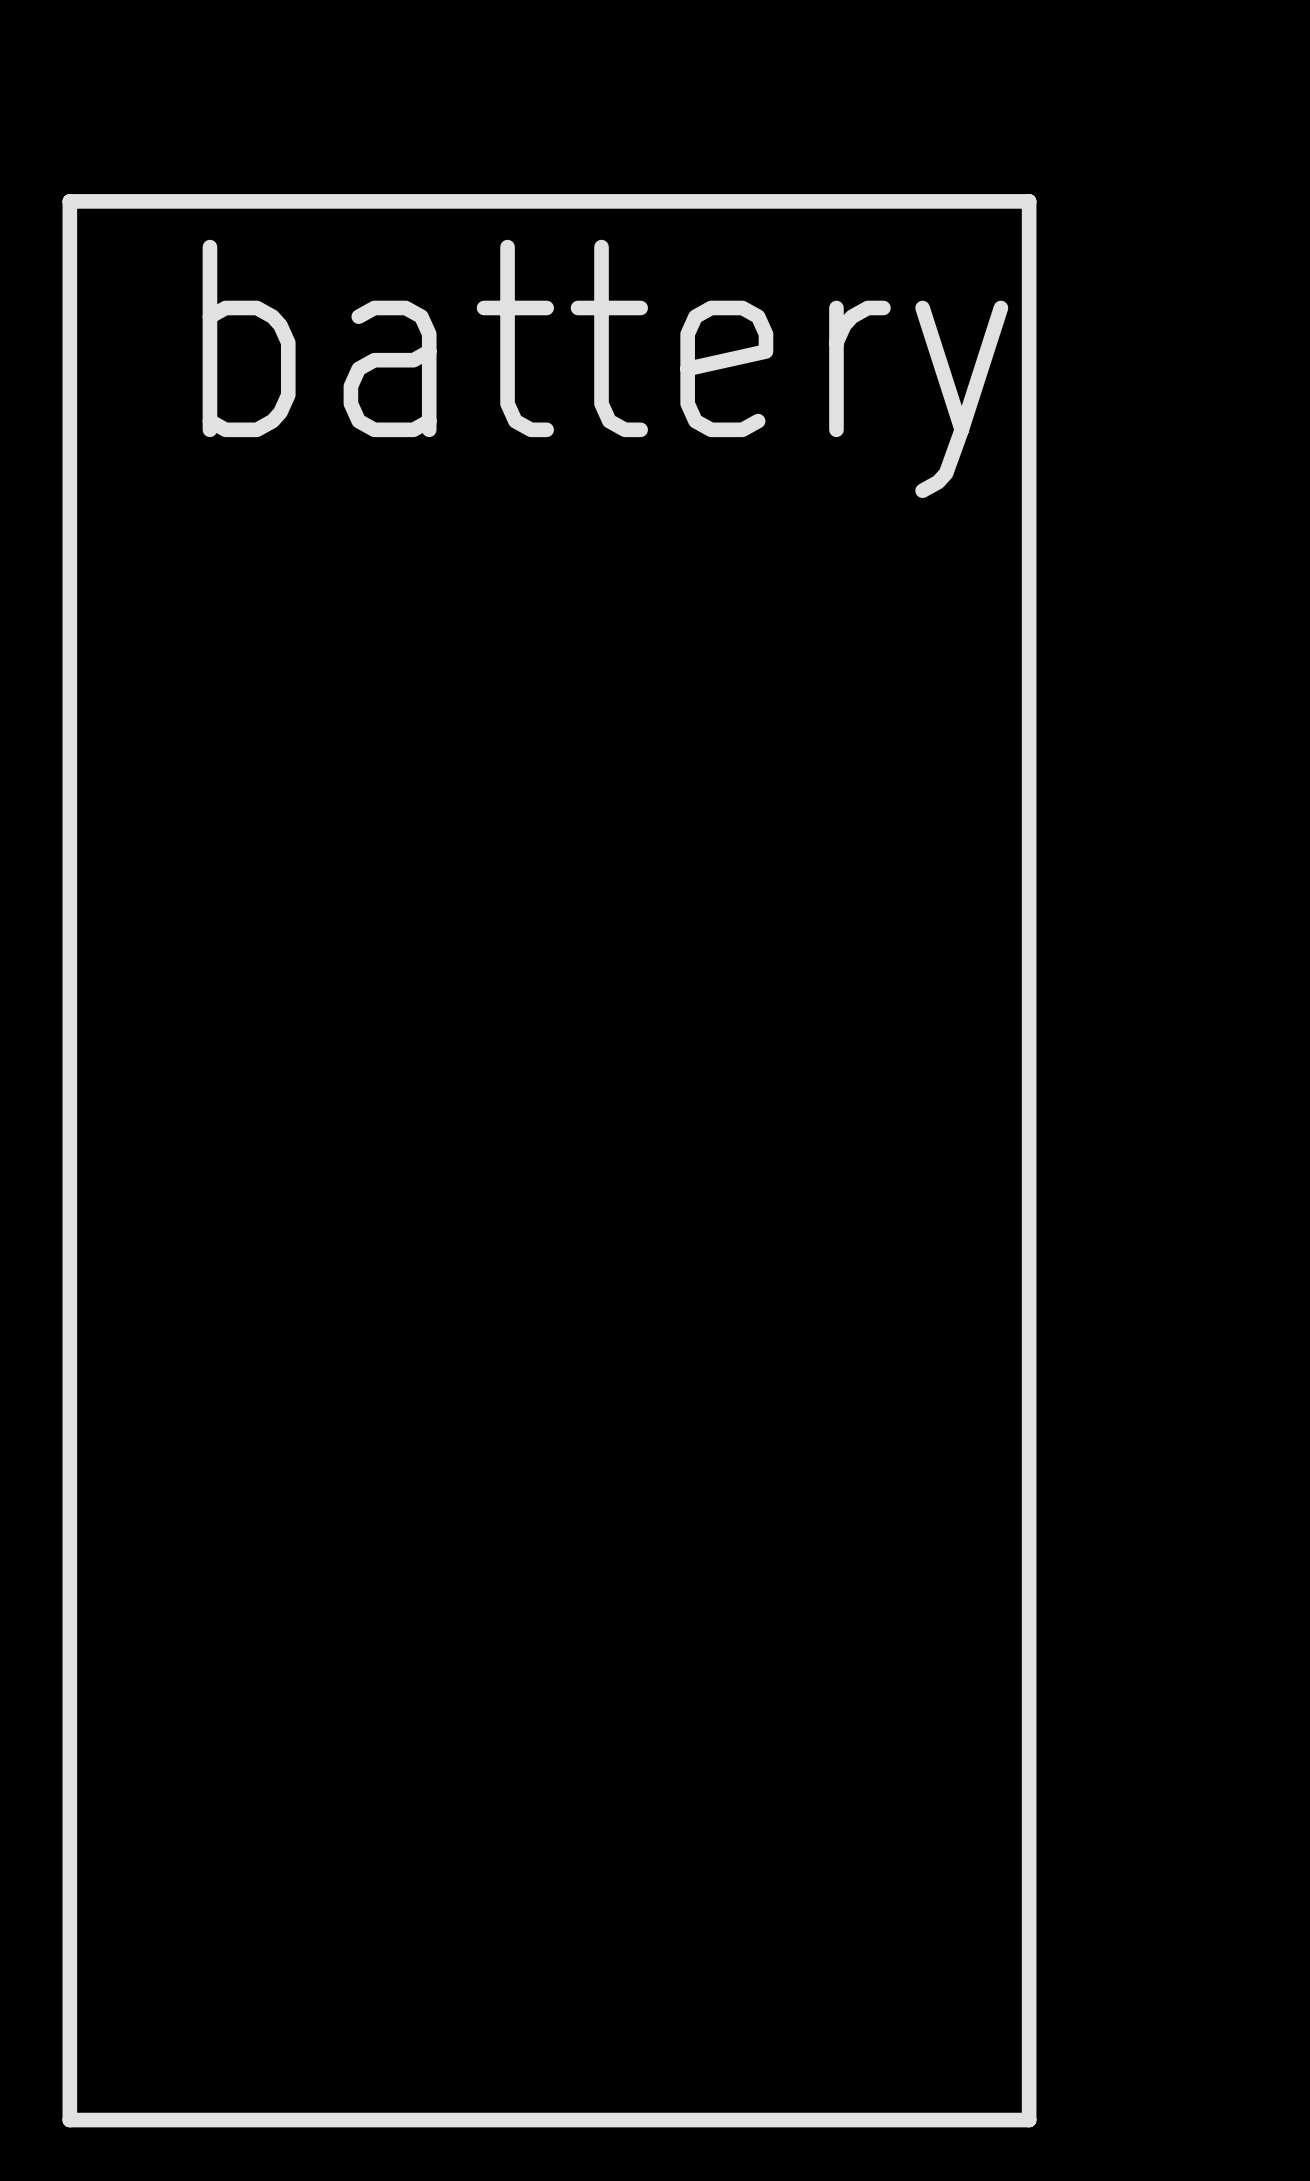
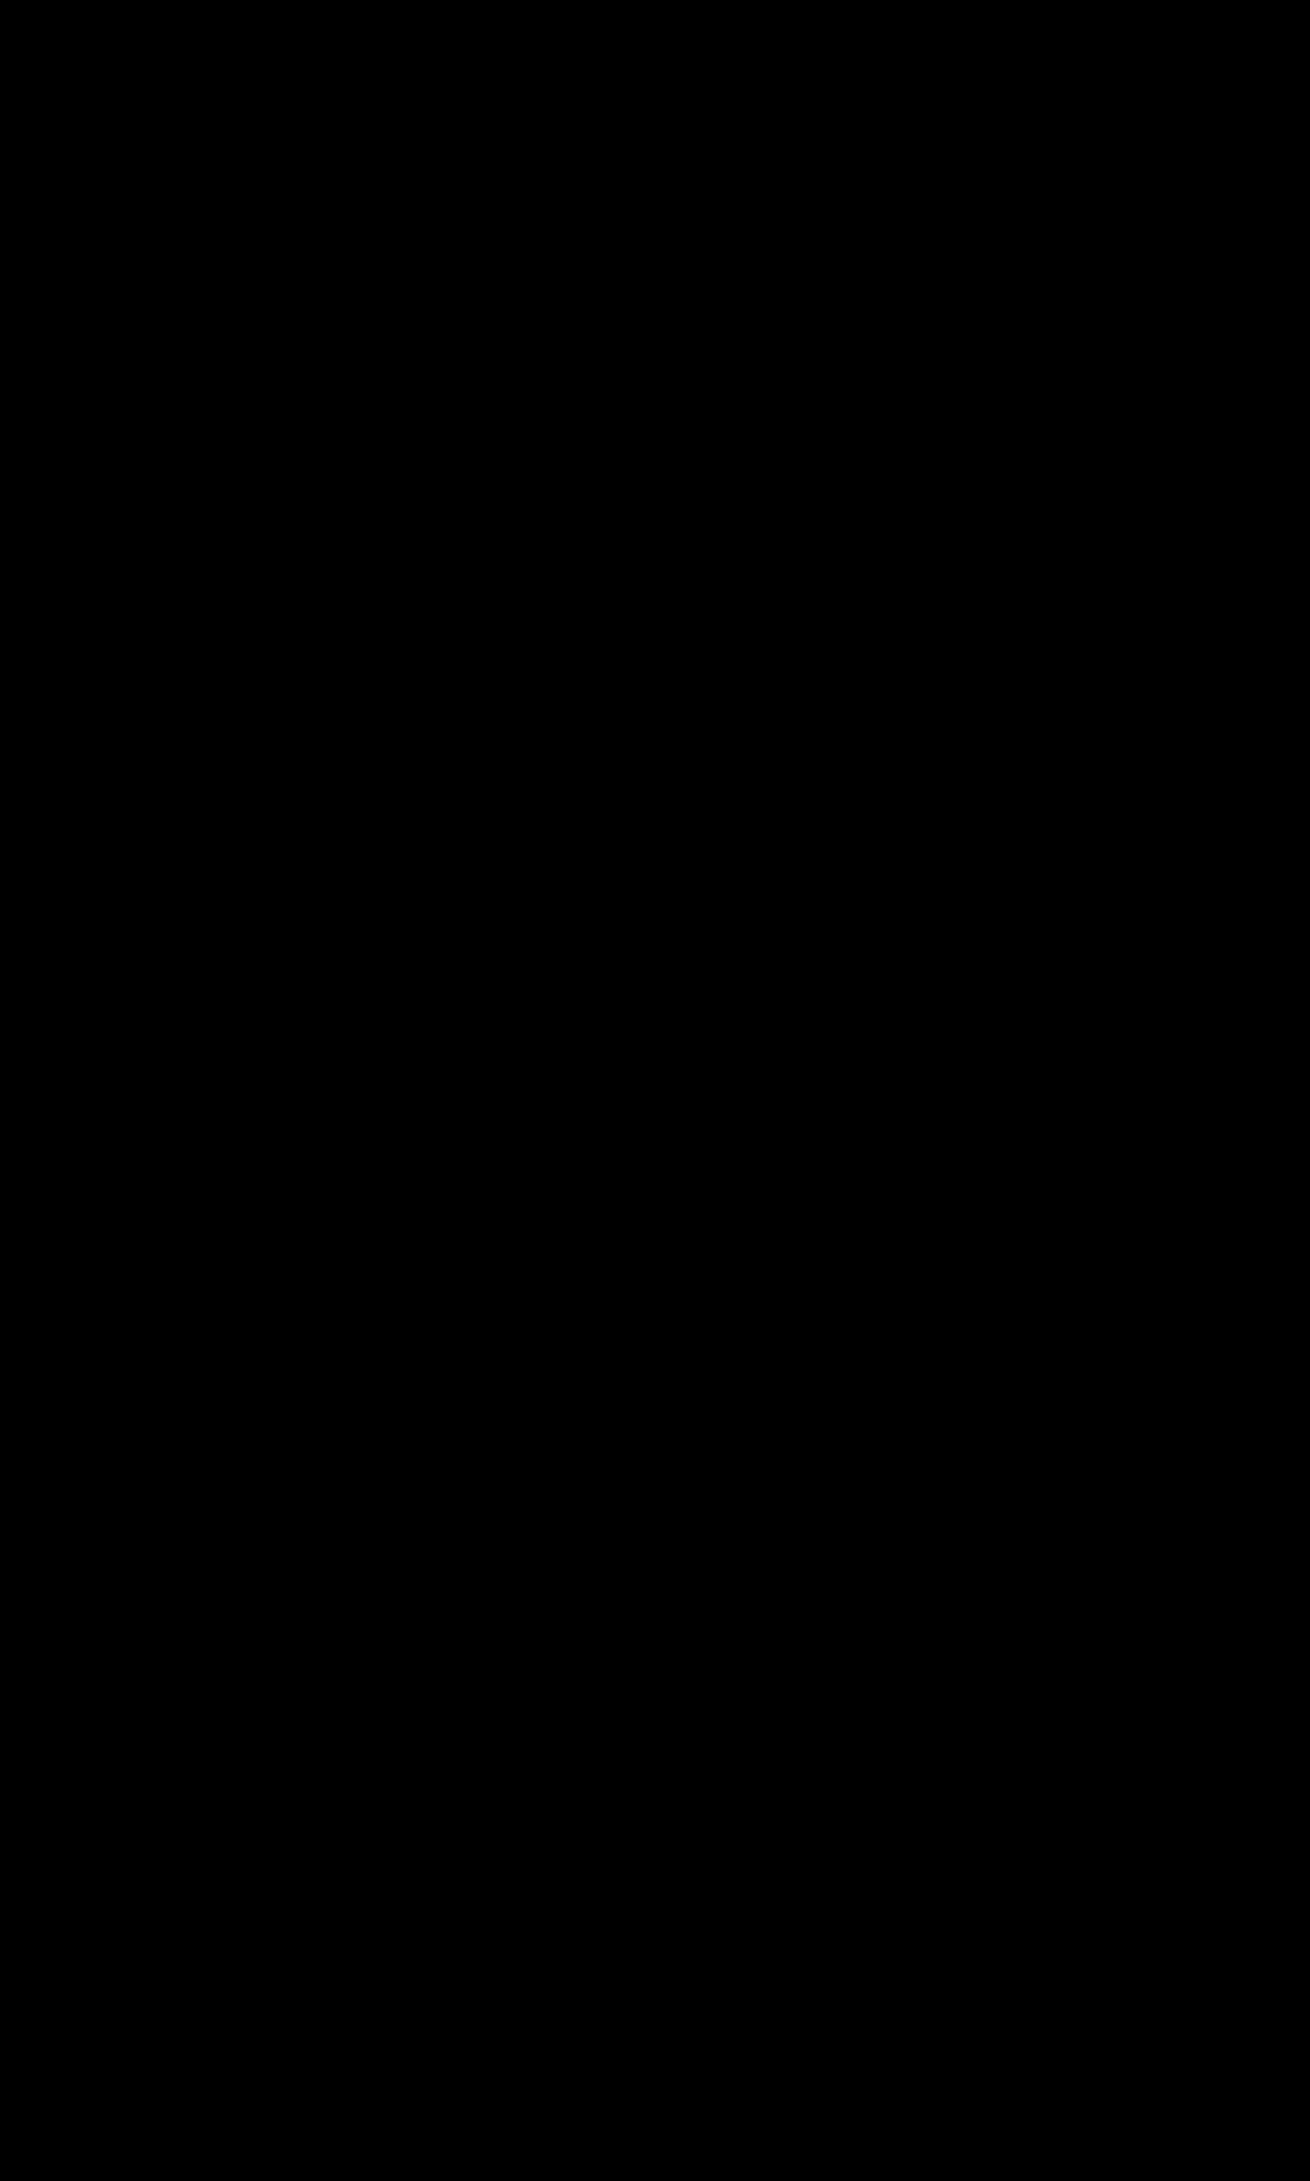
line: (69, 201) (1029, 201) (1029, 2120) (69, 2120) (69, 201) -> none
text: battery (605, 368) -> none

